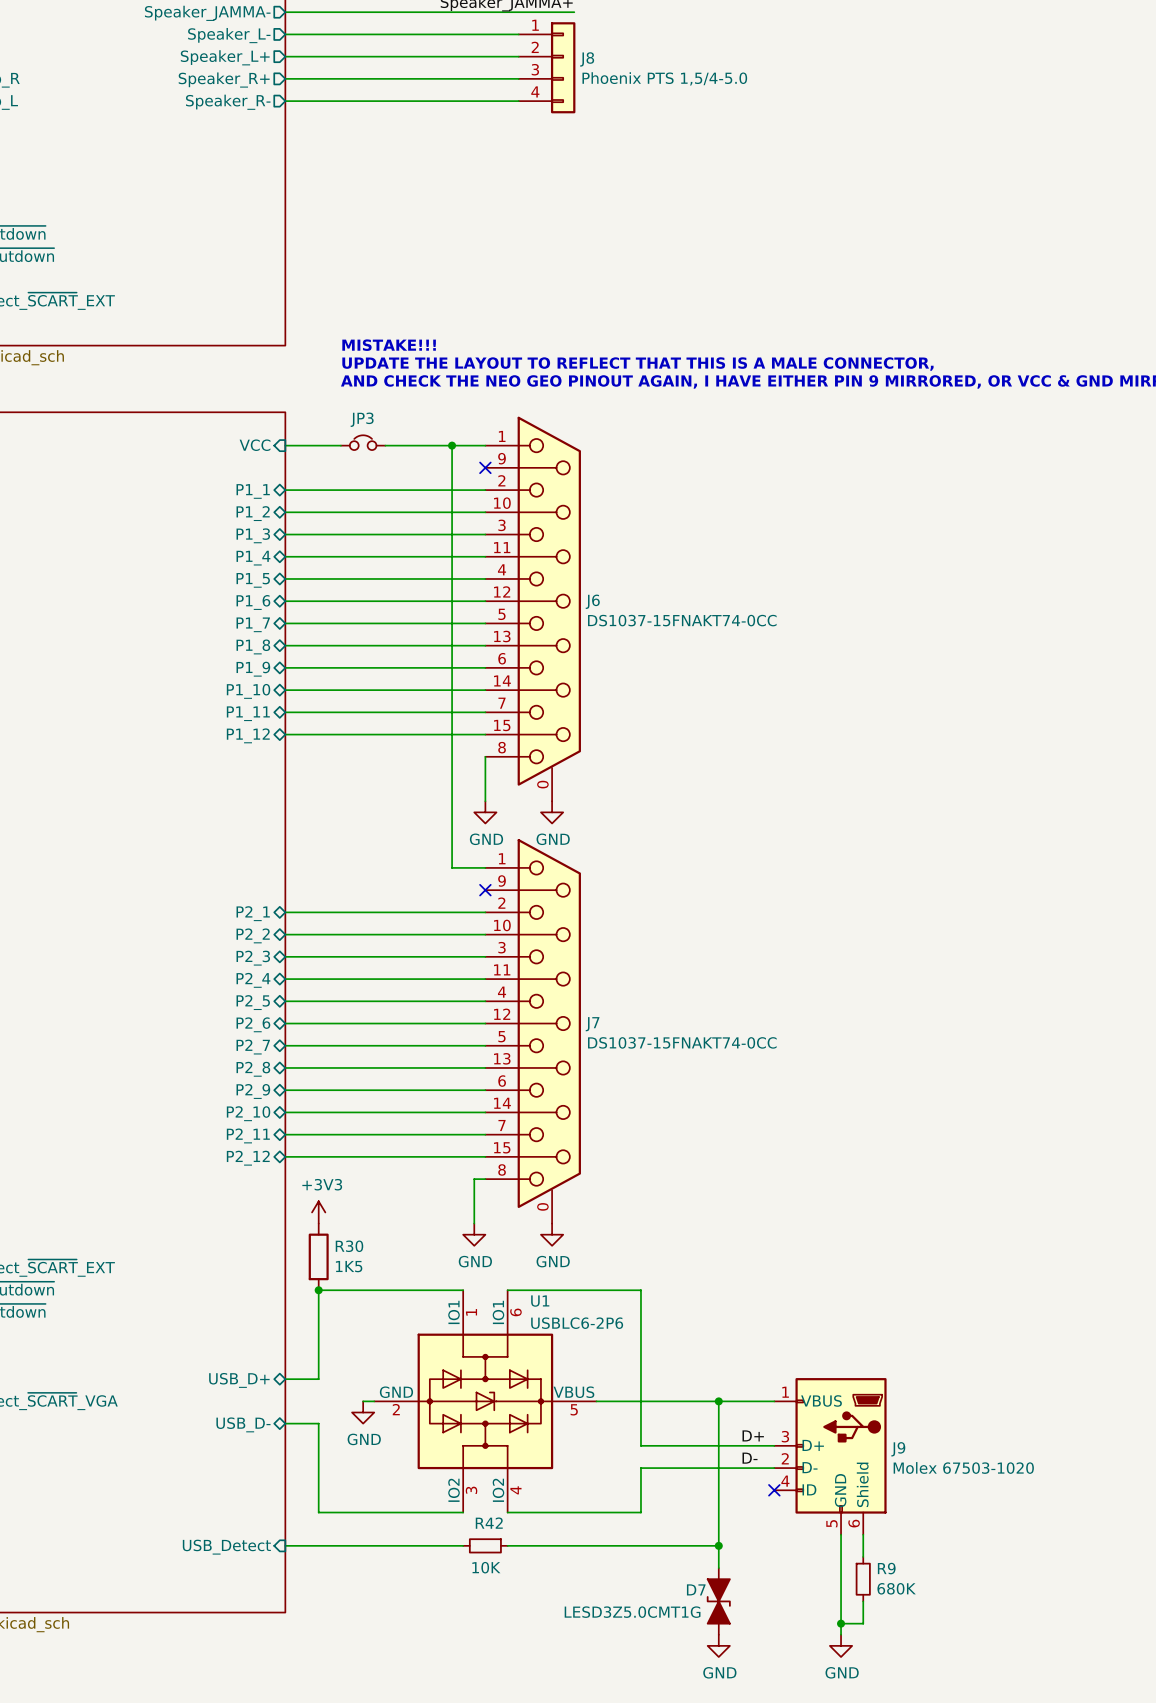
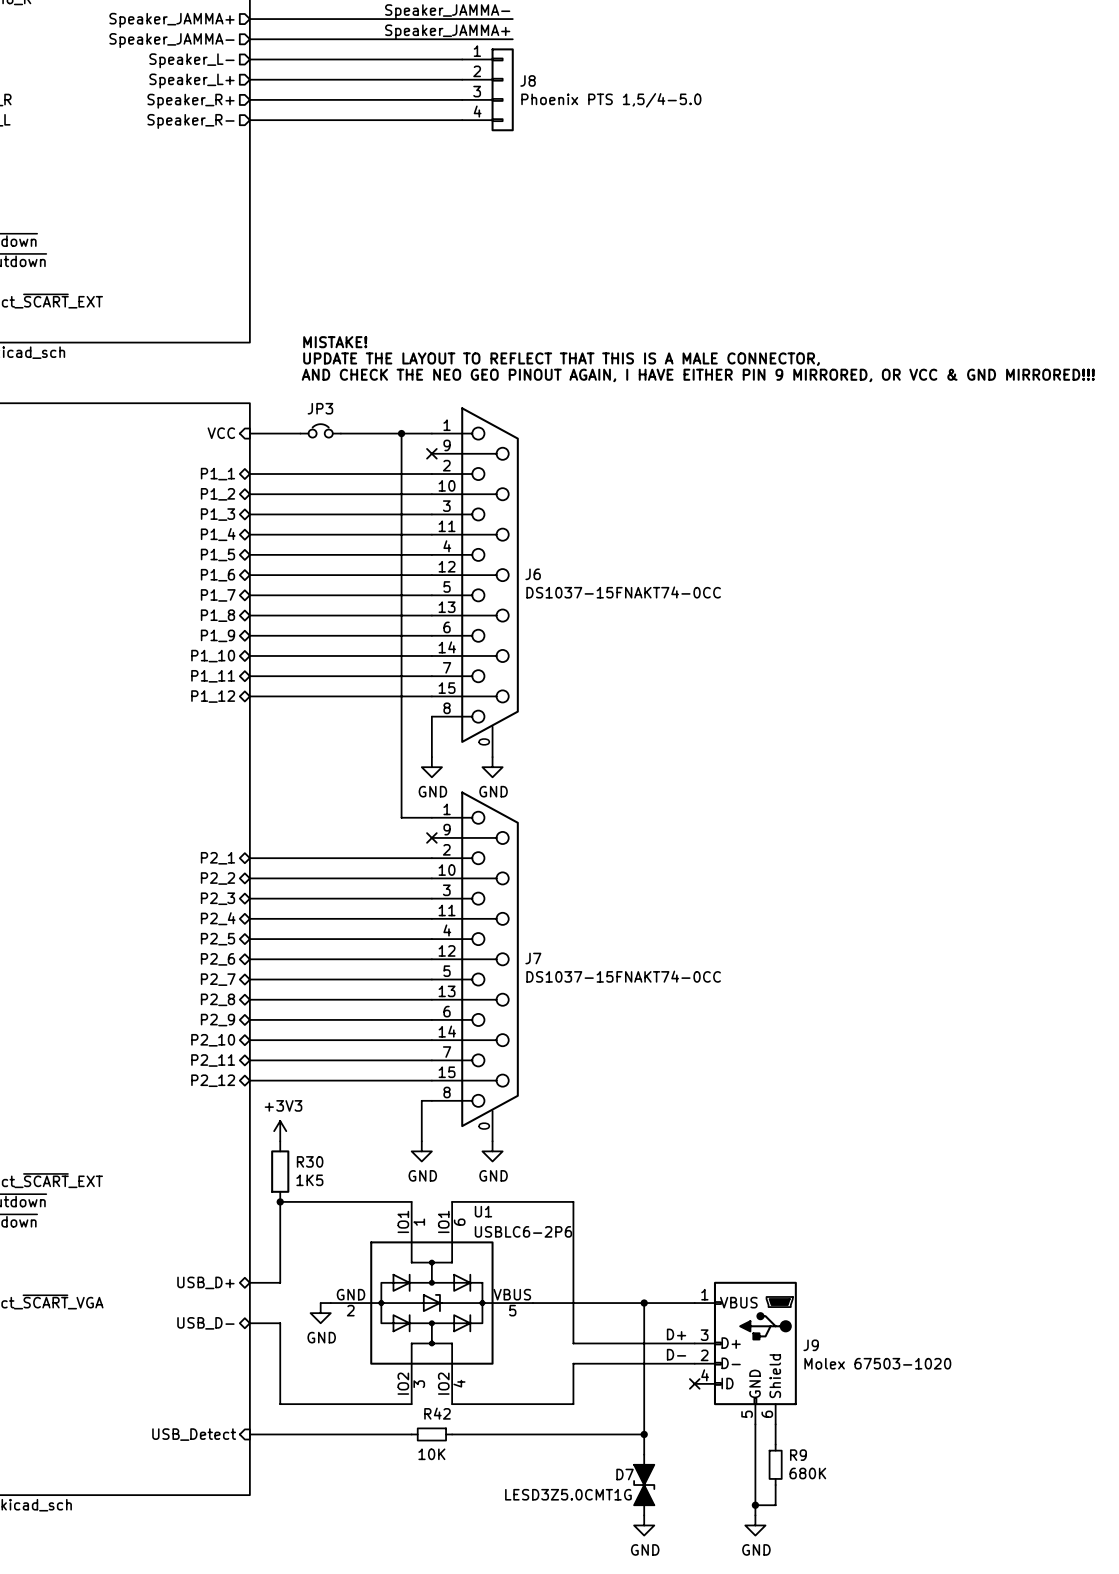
text: MISTAKE!!! (389, 345) -> MISTAKE! (335, 342)

